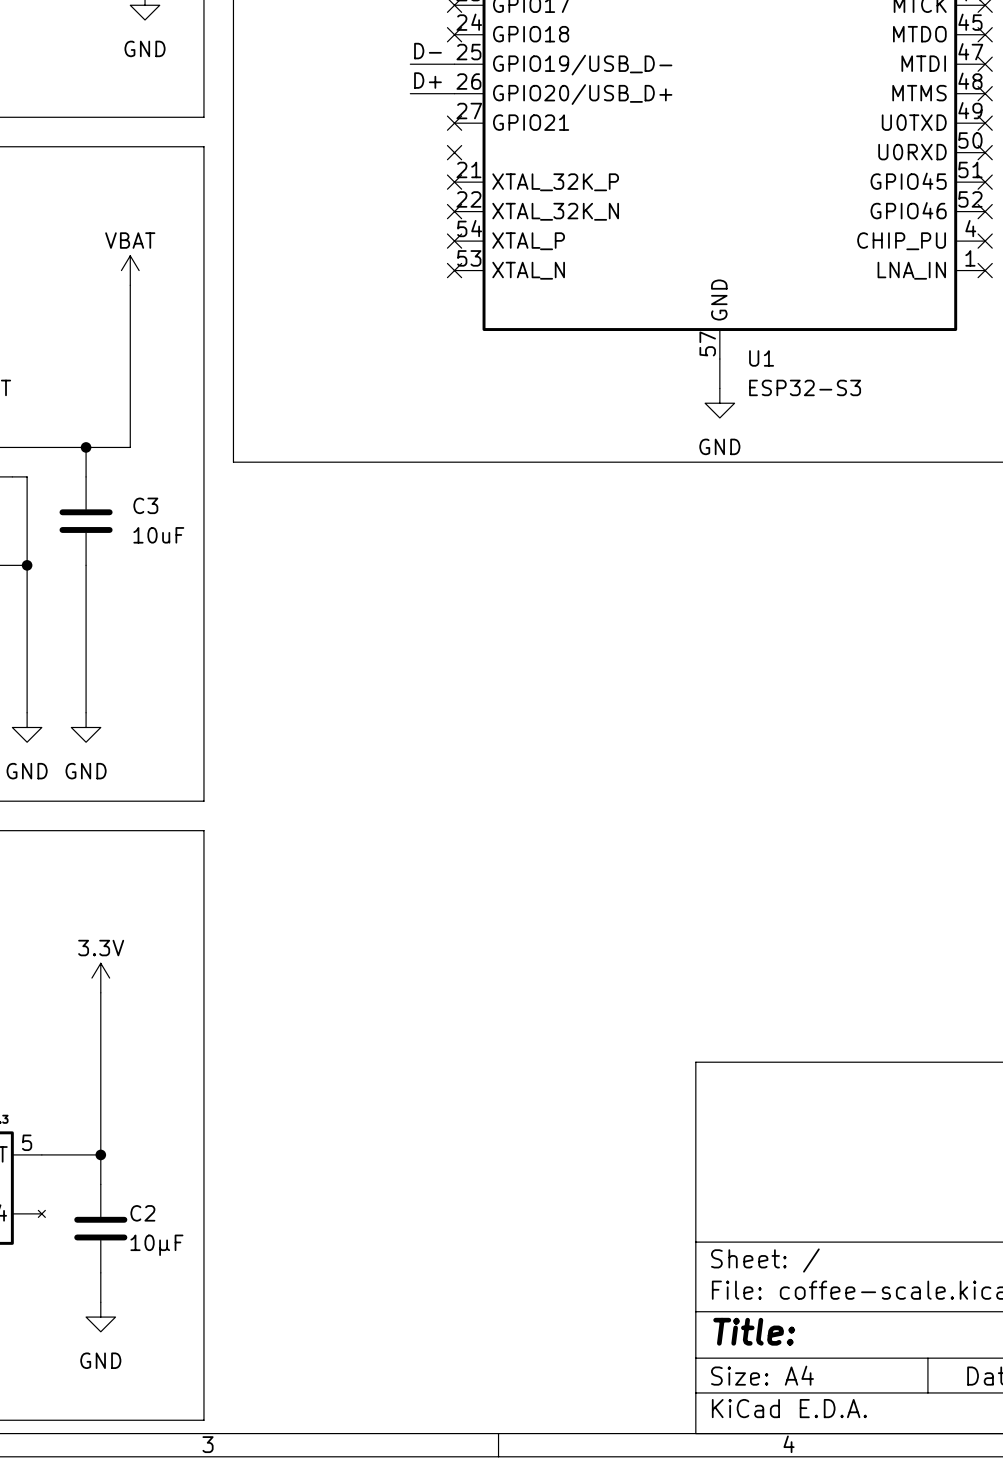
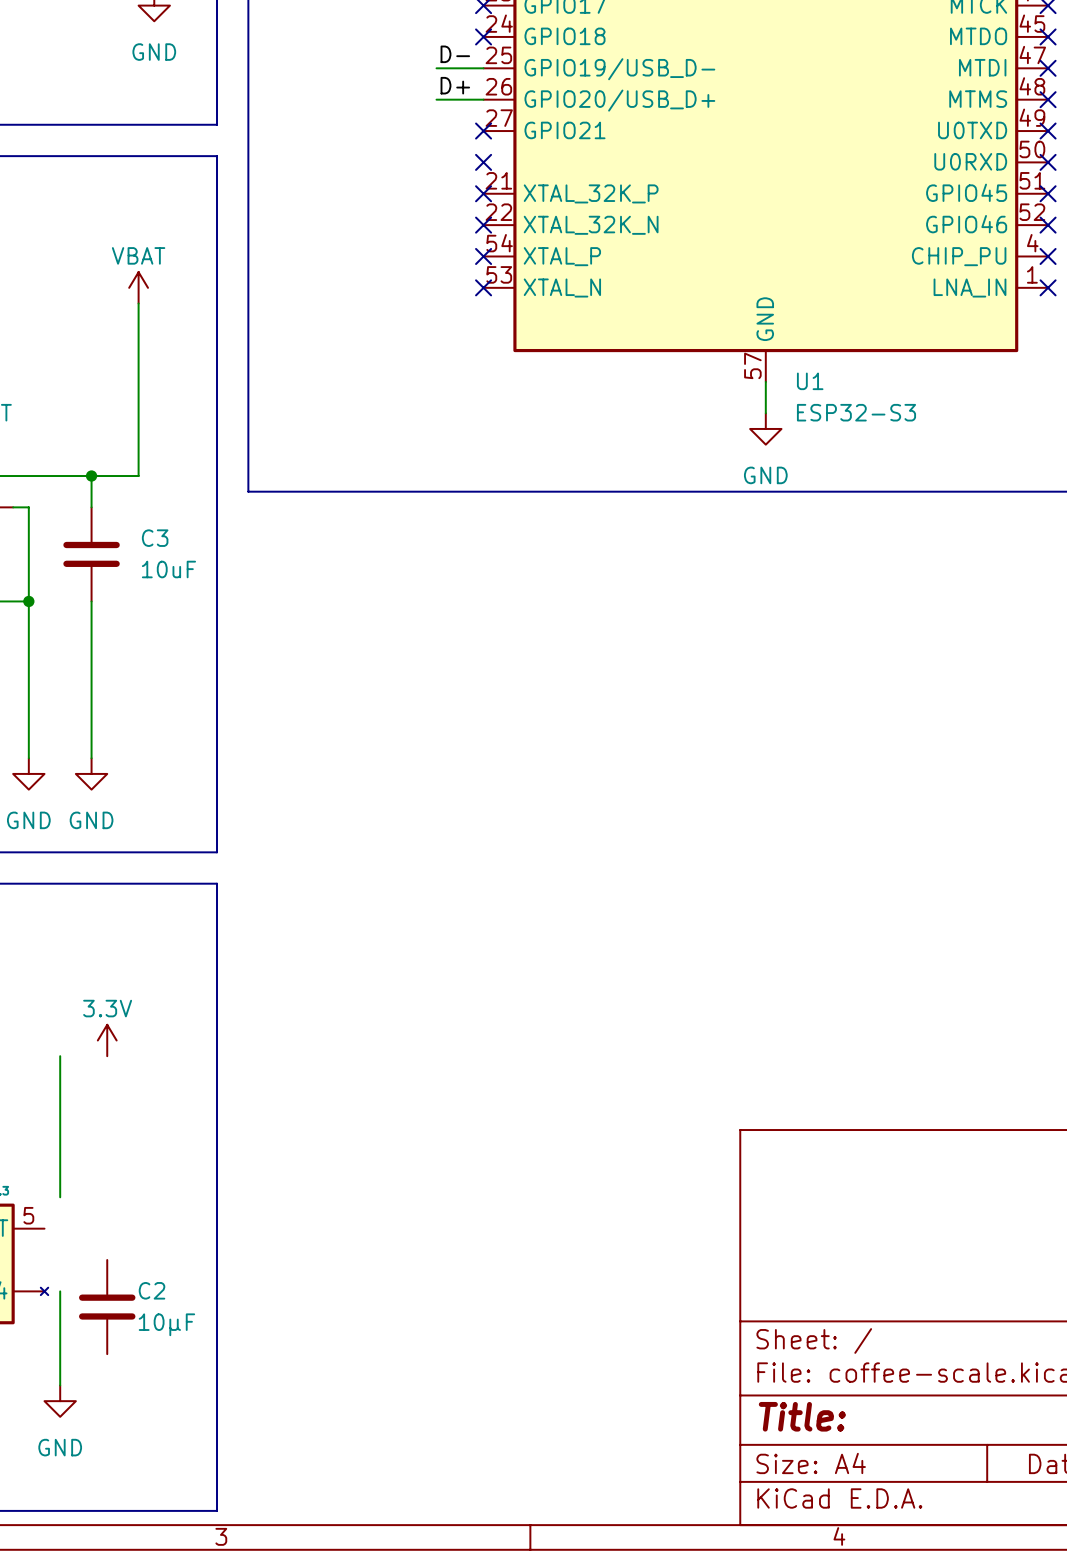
wire: none -> (60, 1056) (60, 1197)
wire: (100, 992) (100, 1184) -> none
wire: (41, 1154) (100, 1154) -> none
junction: (100, 1154) -> none
wire: none -> (60, 1291) (60, 1385)
wire: (100, 1272) (100, 1302) -> none
power symbol position: GND (100, 1317) -> GND (60, 1401)

